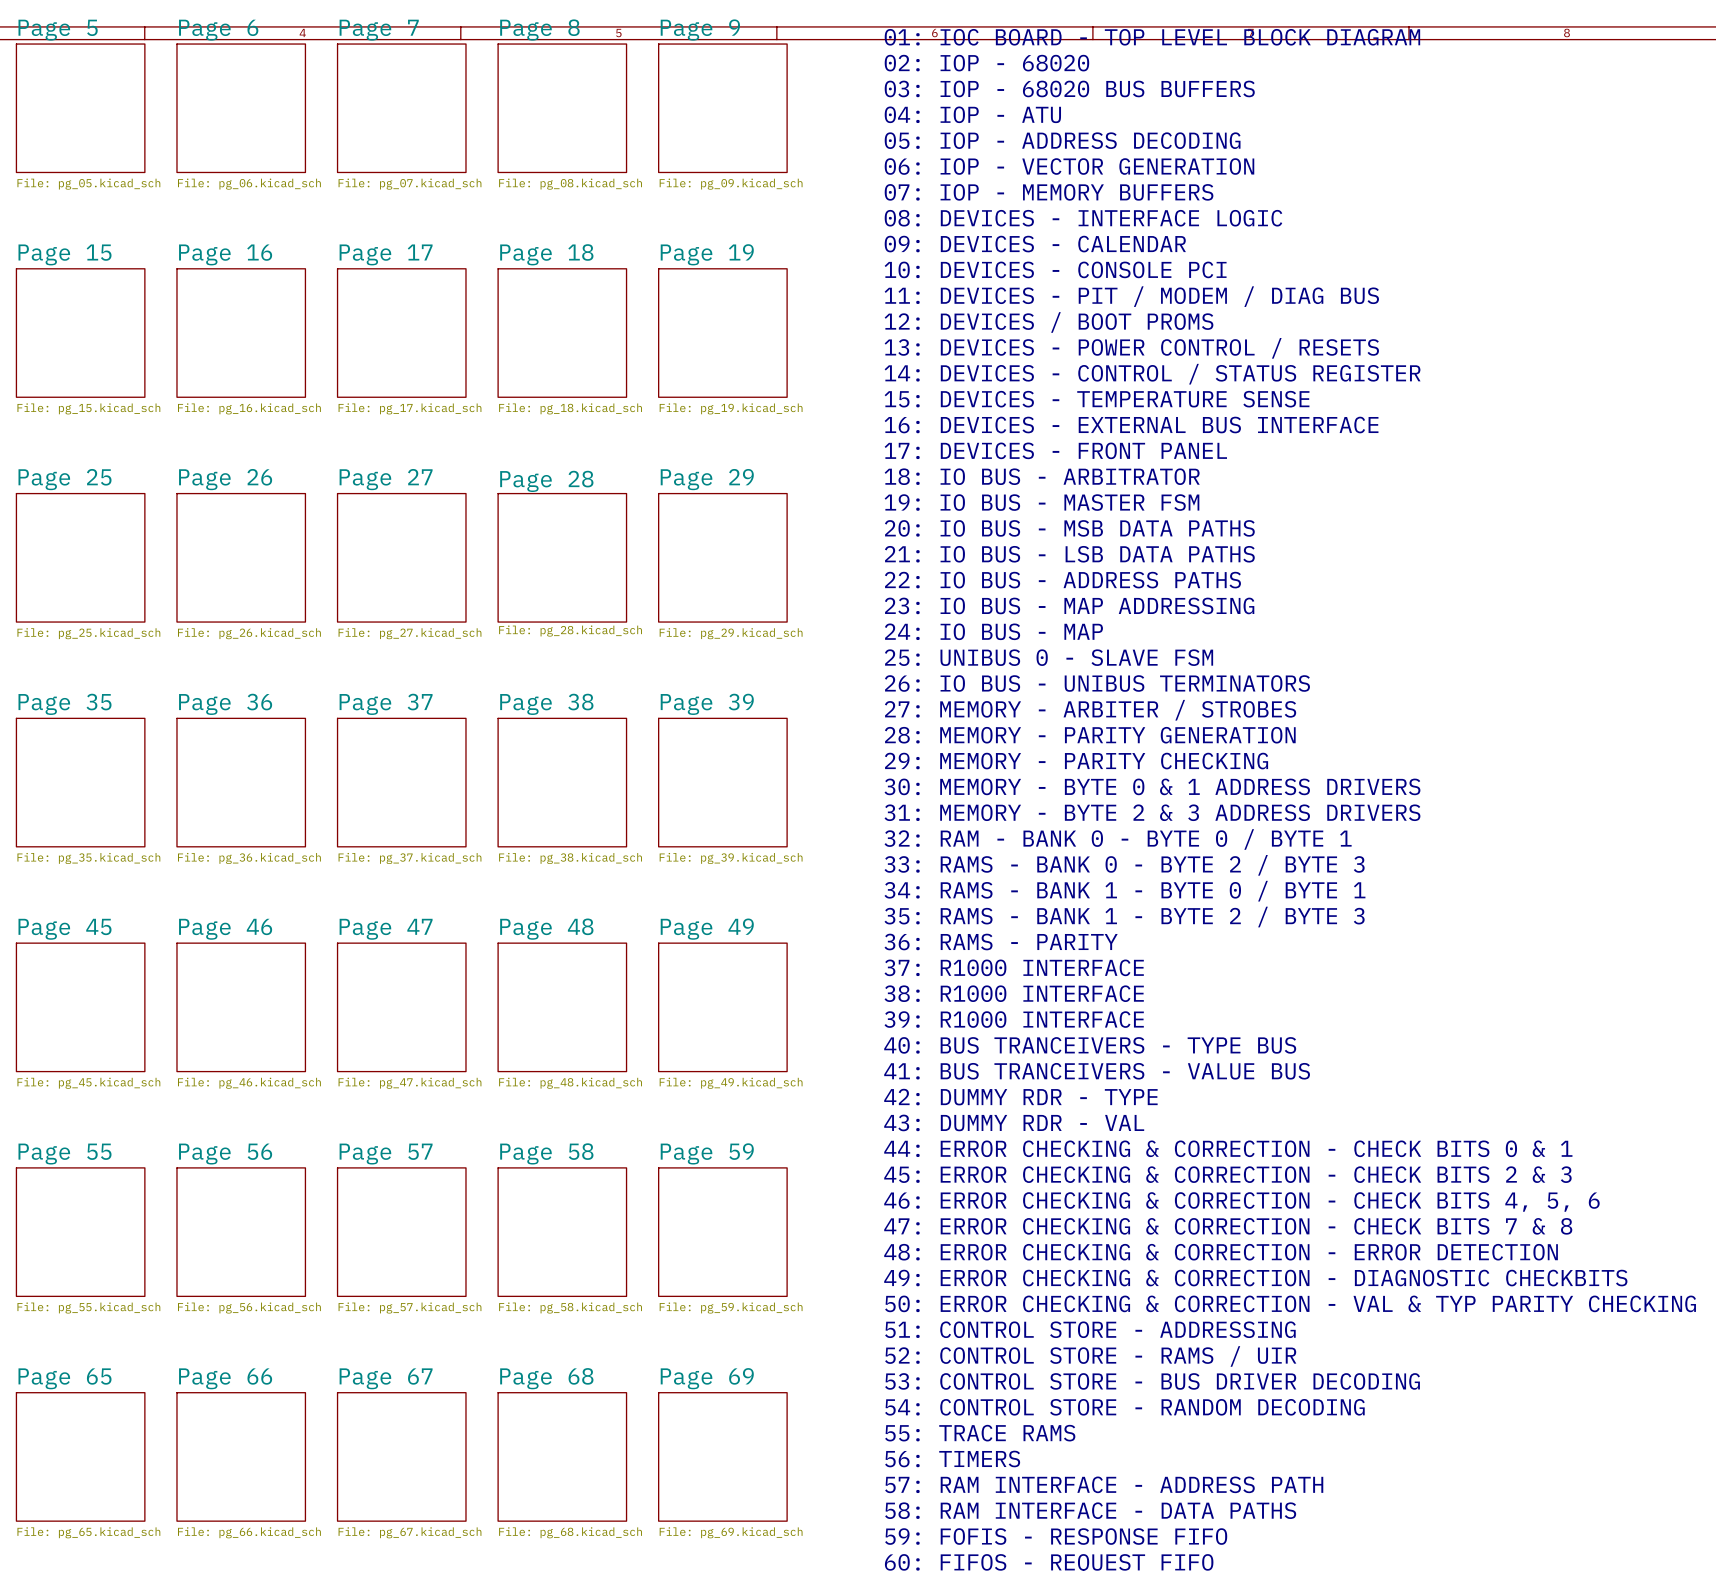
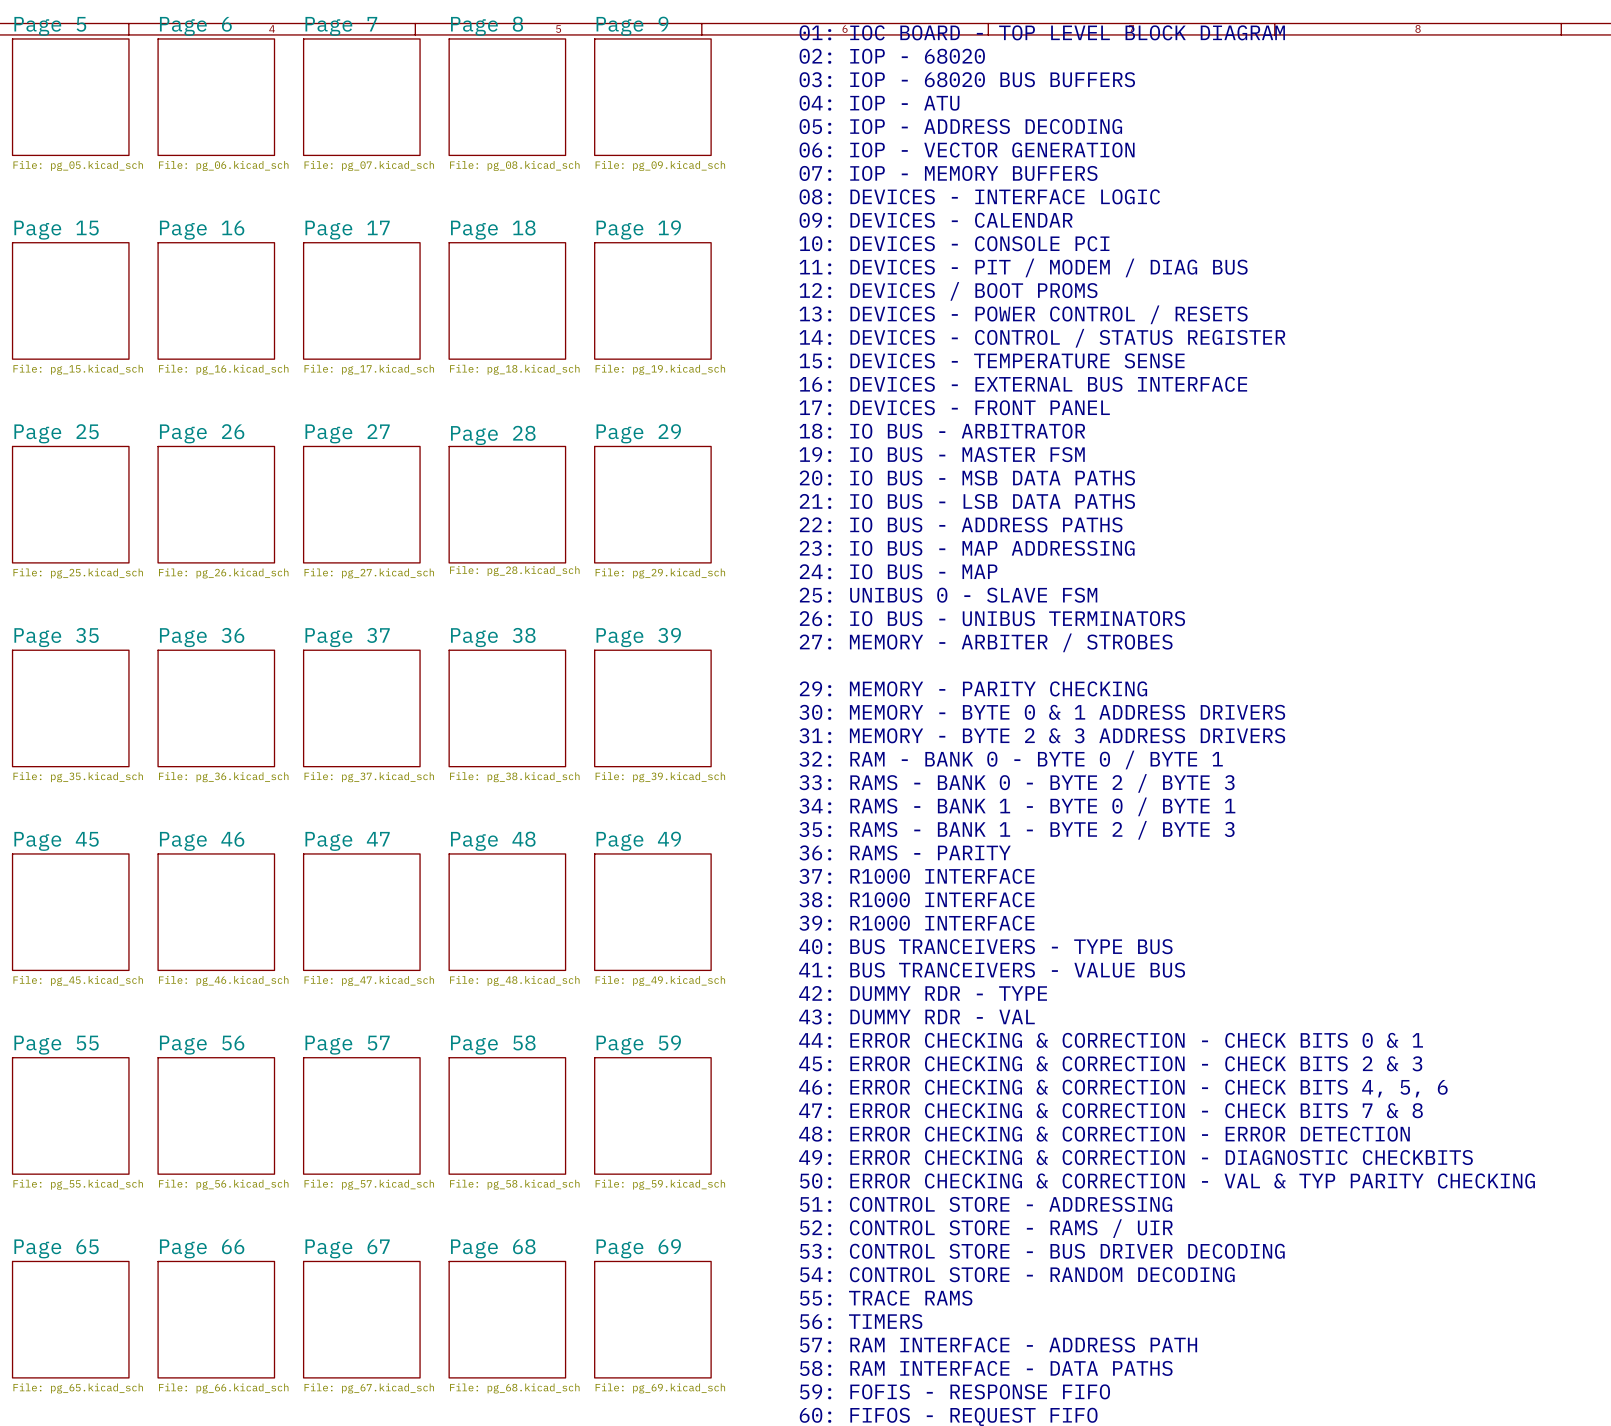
text: 28: MEMORY - PARITY GENERATION (1090, 735) -> none

